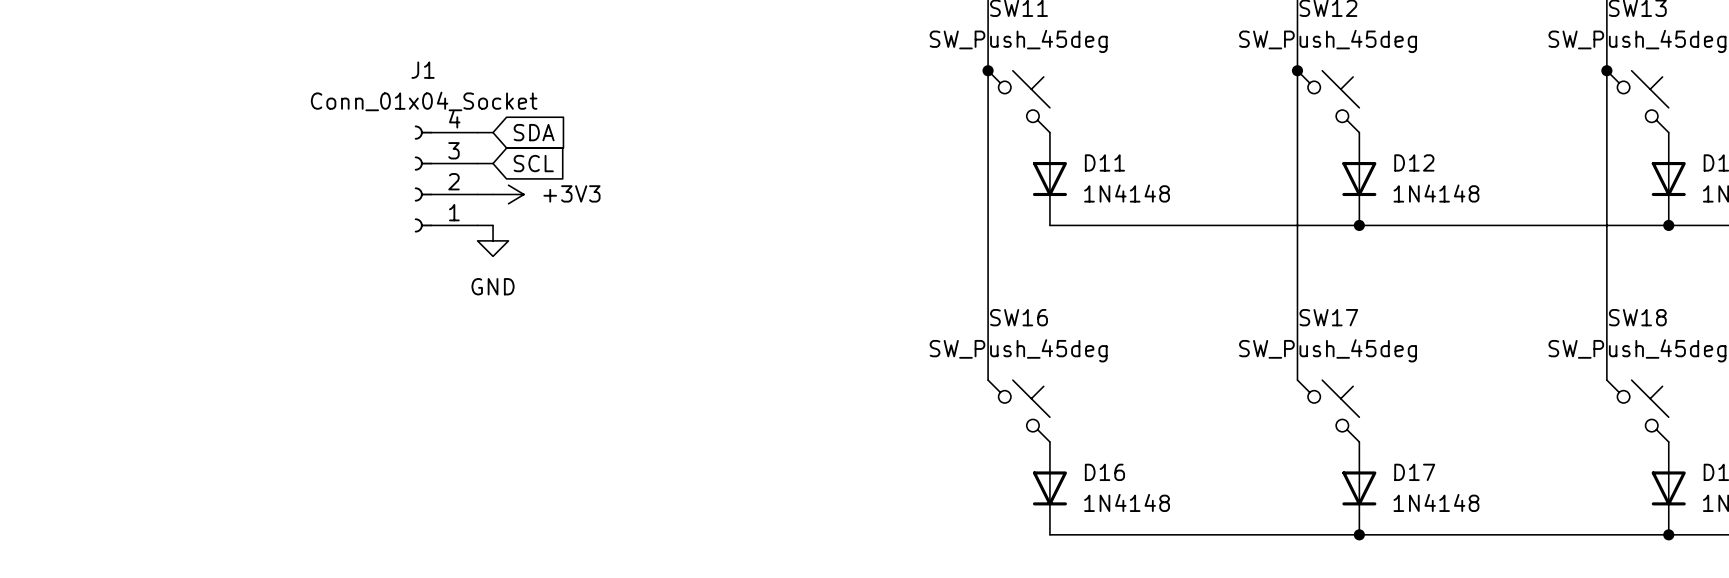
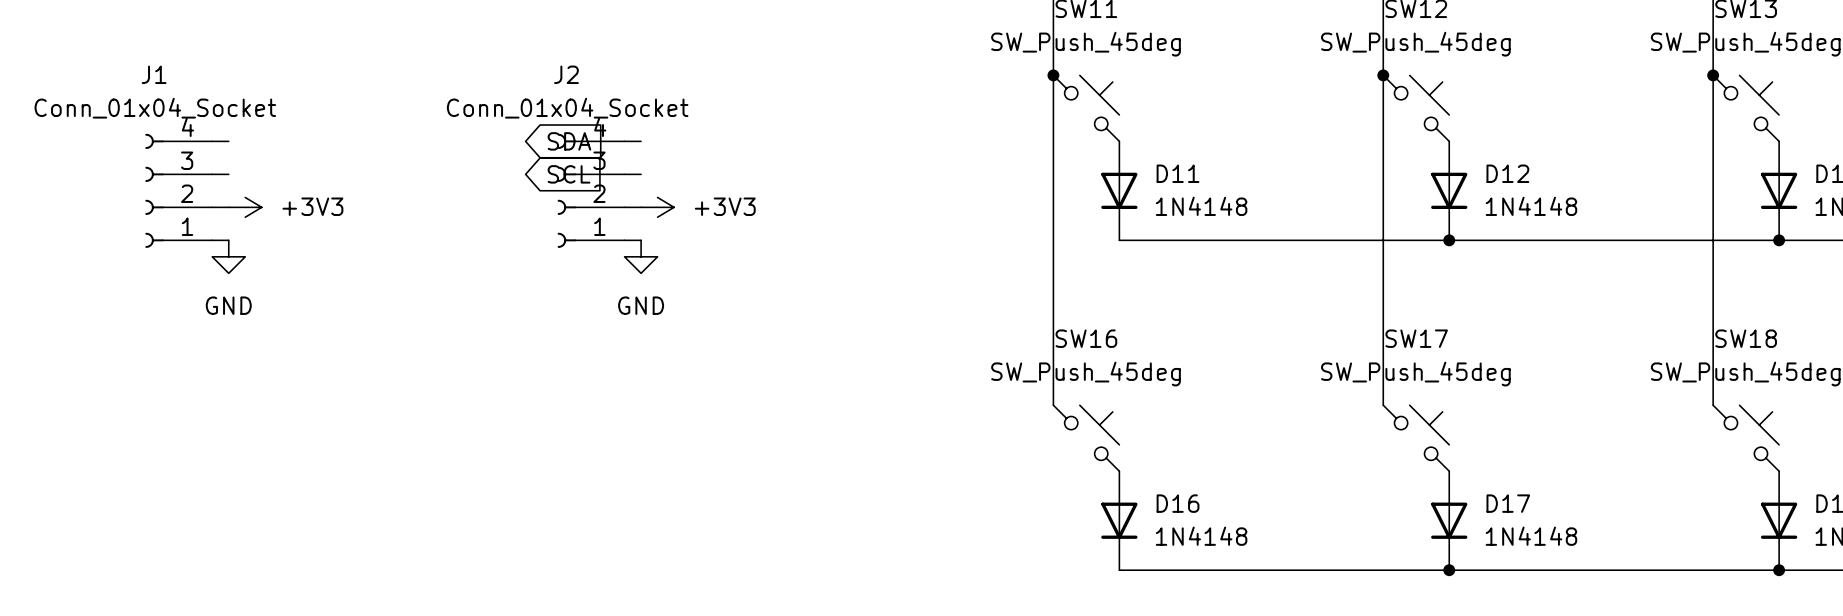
wire: none -> (212, 141) (228, 141)
wire: (477, 132) (493, 132) -> (624, 141) (641, 141)
wire: none -> (212, 174) (228, 174)
wire: (477, 163) (493, 163) -> (624, 174) (641, 174)
J1 position: (446, 179) -> (178, 190)
J2: none -> Conn_01x04_Socket (591, 190)
wire: none -> (212, 207) (228, 207)
power symbol: none -> +3V3 (245, 207)
wire: (477, 194) (493, 194) -> (624, 207) (641, 207)
power symbol position: +3V3 (508, 194) -> +3V3 (657, 207)
wire: none -> (212, 240) (228, 240)
wire: (477, 225) (493, 225) -> (624, 240) (641, 240)
power symbol: none -> GND (228, 256)
power symbol position: GND (493, 240) -> GND (641, 256)

